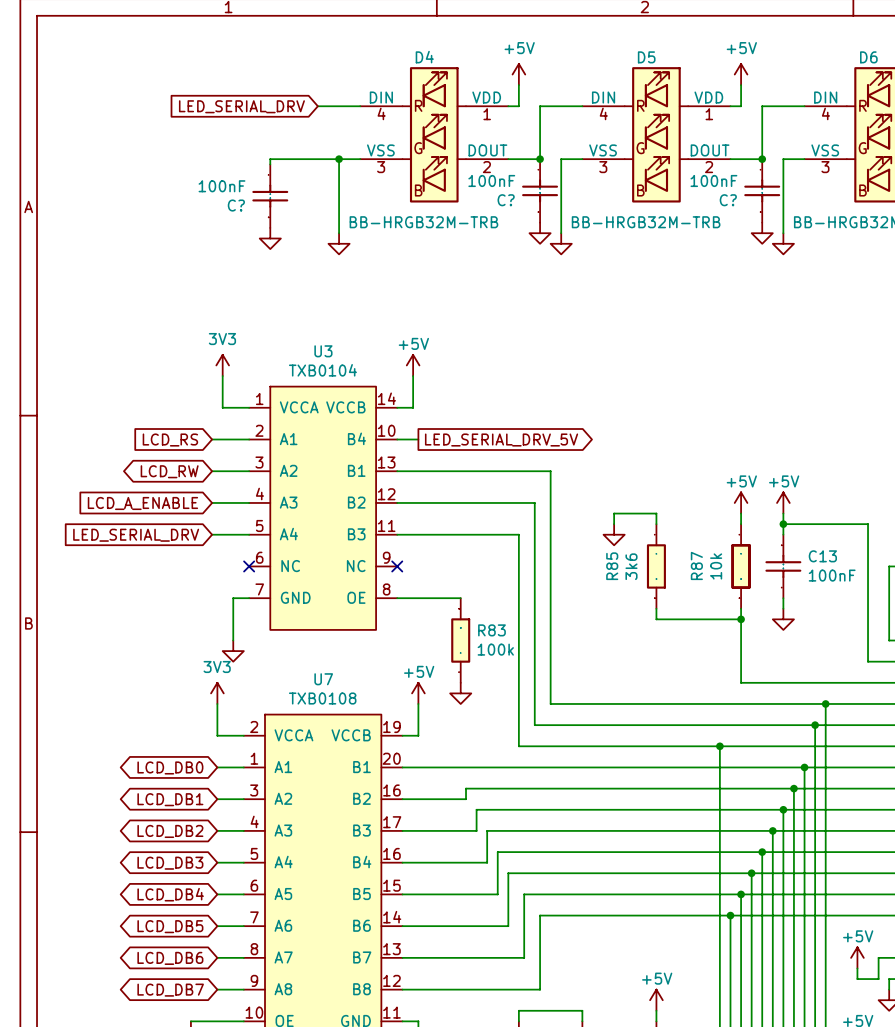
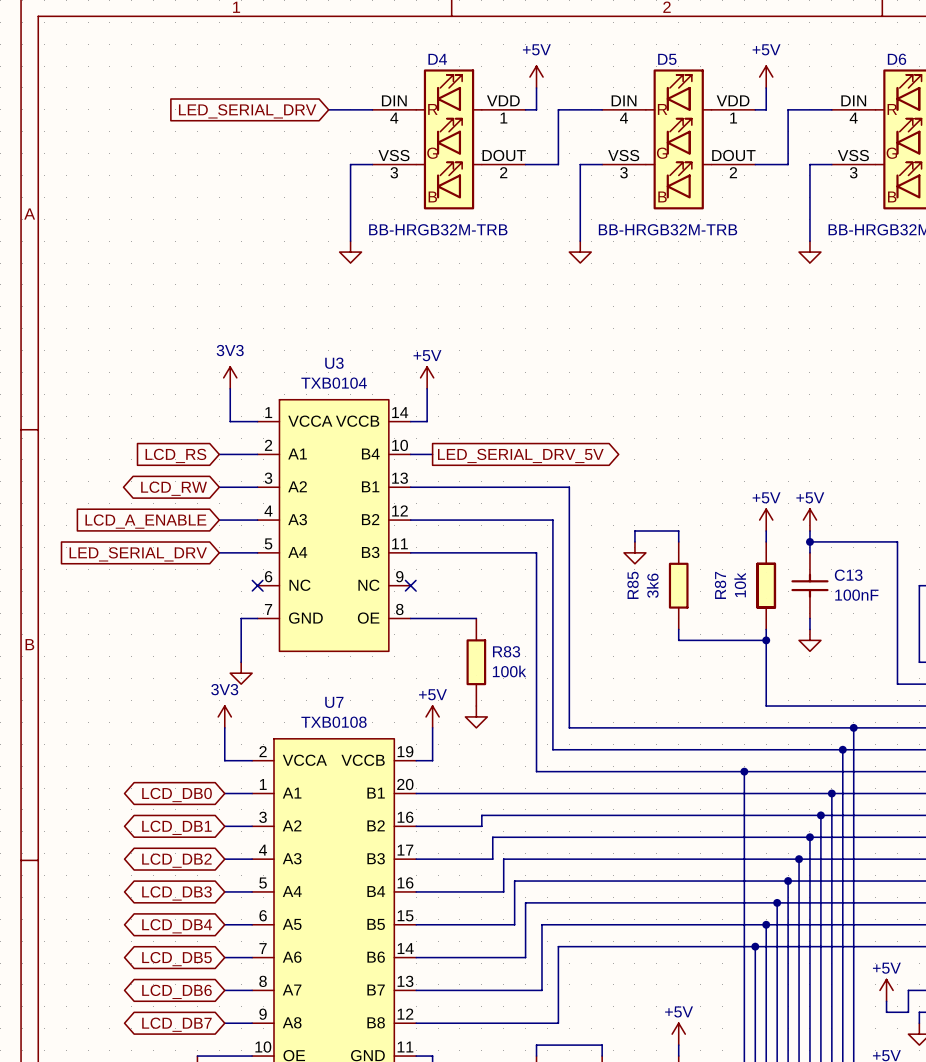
wire: (339, 159) (270, 159) (270, 164) -> none
junction: (339, 159) -> none
junction: (540, 159) -> none
junction: (762, 159) -> none
C?: (540, 190) -> none
C?: (762, 190) -> none
C?: (270, 196) -> none
power symbol: (540, 233) -> none
power symbol: (762, 233) -> none
power symbol: (270, 238) -> none

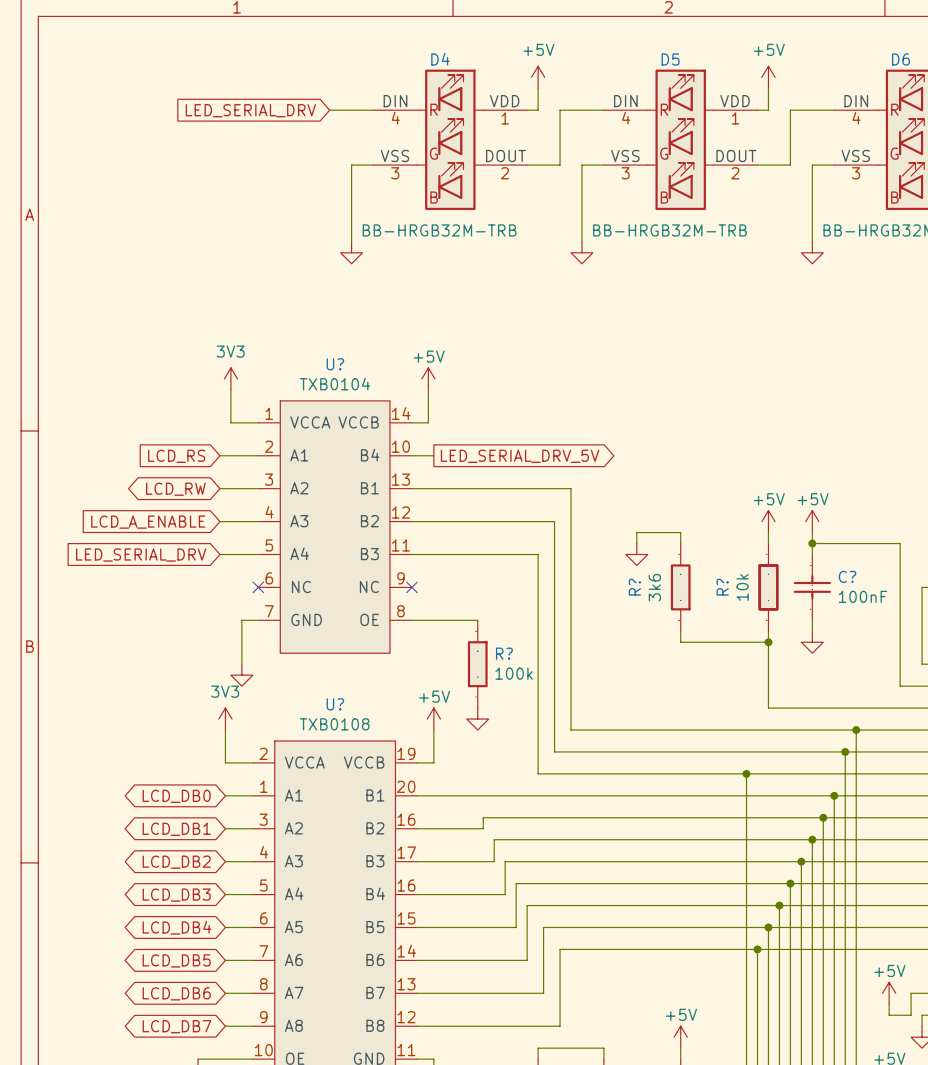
U3 name: U3 (334, 363) -> U? (335, 364)
C13 name: C13 (848, 575) -> C? (847, 576)
R85 name: R85 (633, 585) -> R? (634, 587)
R87 name: R87 (720, 585) -> R? (722, 587)
R83 name: R83 (506, 651) -> R? (504, 653)
U7 name: U7 (334, 702) -> U? (335, 704)

